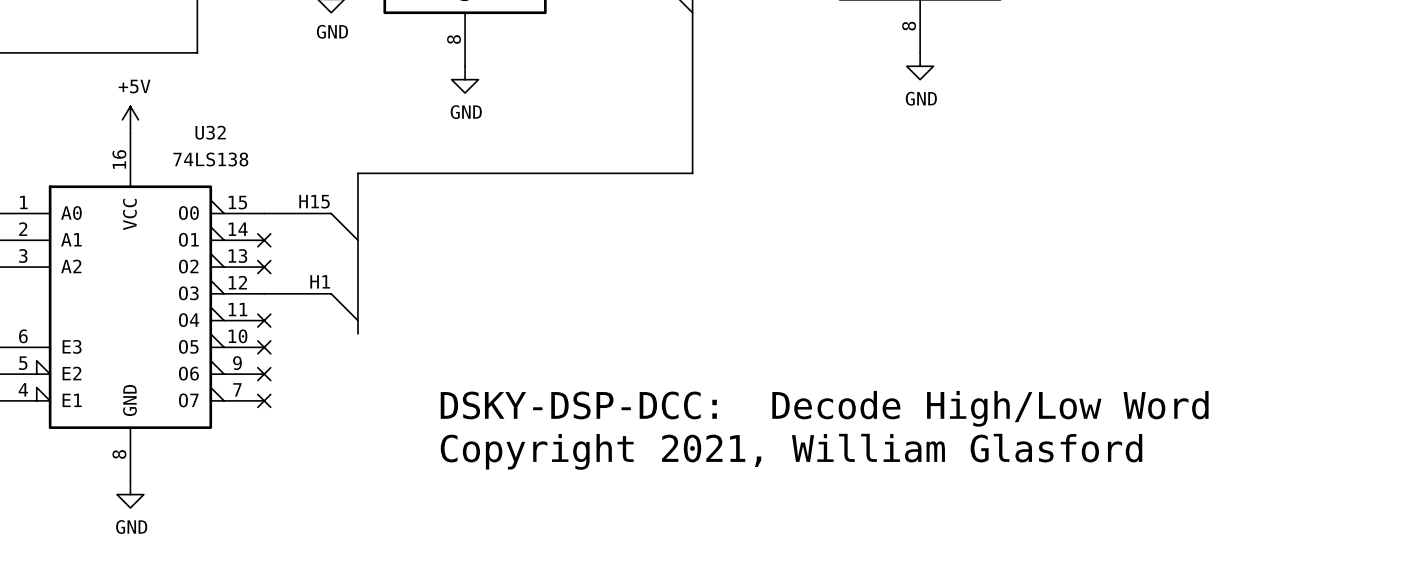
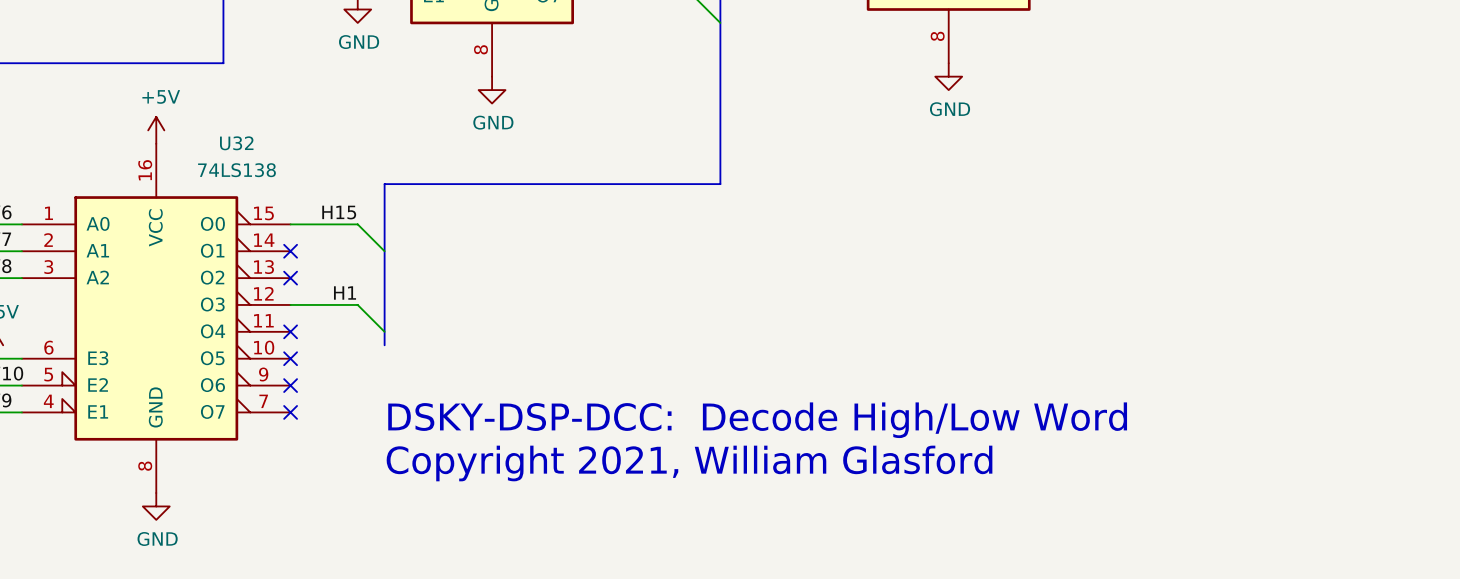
text position: DSKY-DSP-DCC: Decode High/Low Word (824, 408) -> DSKY-DSP-DCC: Decode High/Low Word (757, 420)
text position: Copyright 2021, William Glasford (791, 451) -> Copyright 2021, William Glasford (689, 463)

